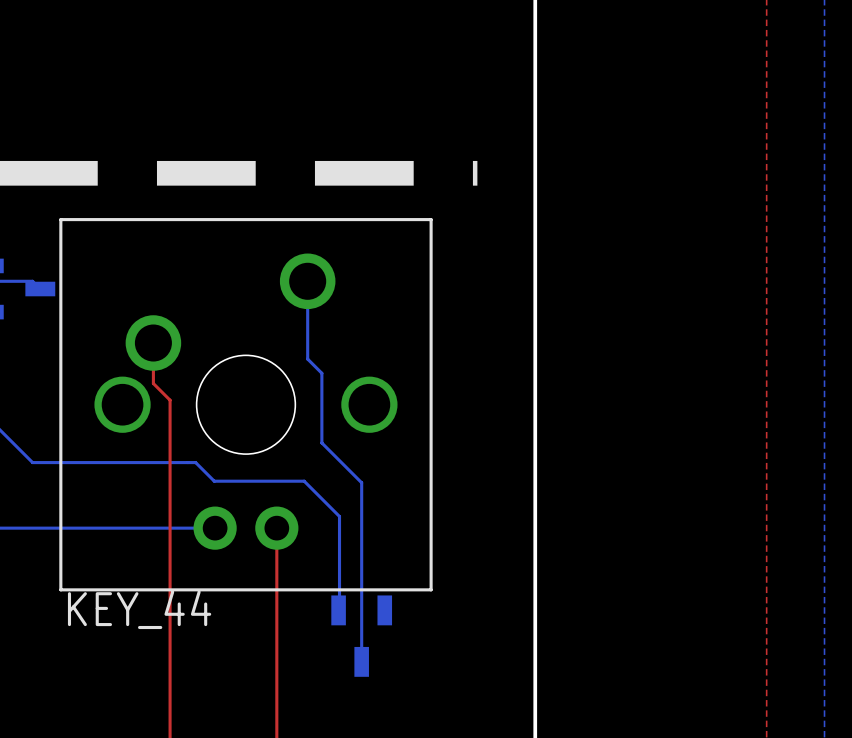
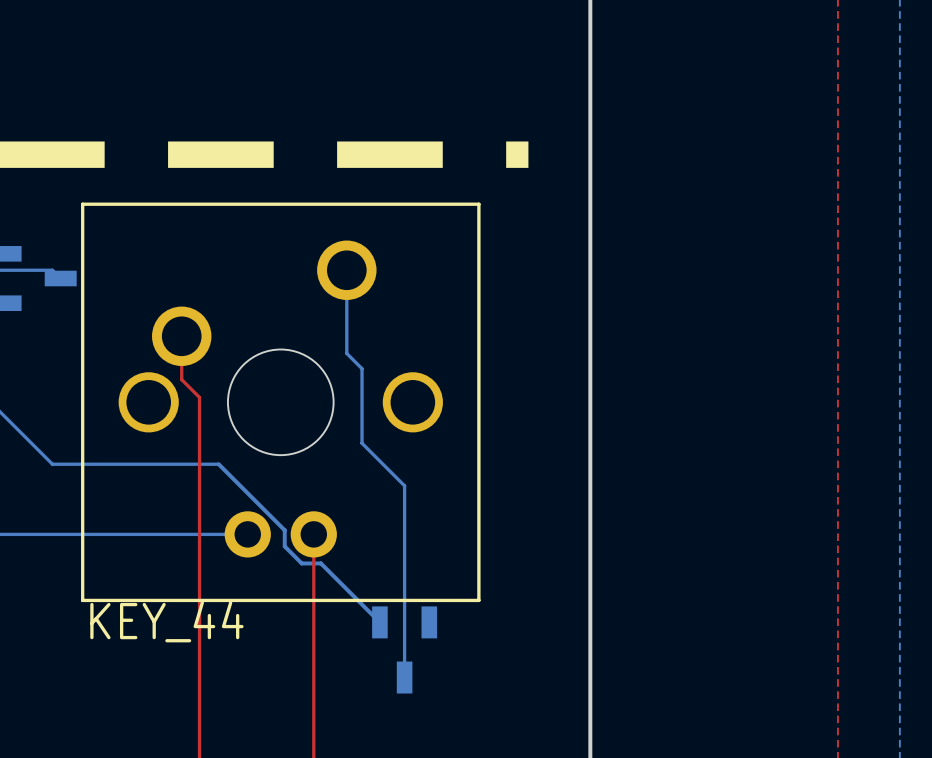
bottom track: (187, 462) (195, 462) (214, 481) (304, 481) (339, 516) (338, 610) -> (218, 464) (284, 530) (284, 546) (301, 563) (320, 563) (379, 622)

